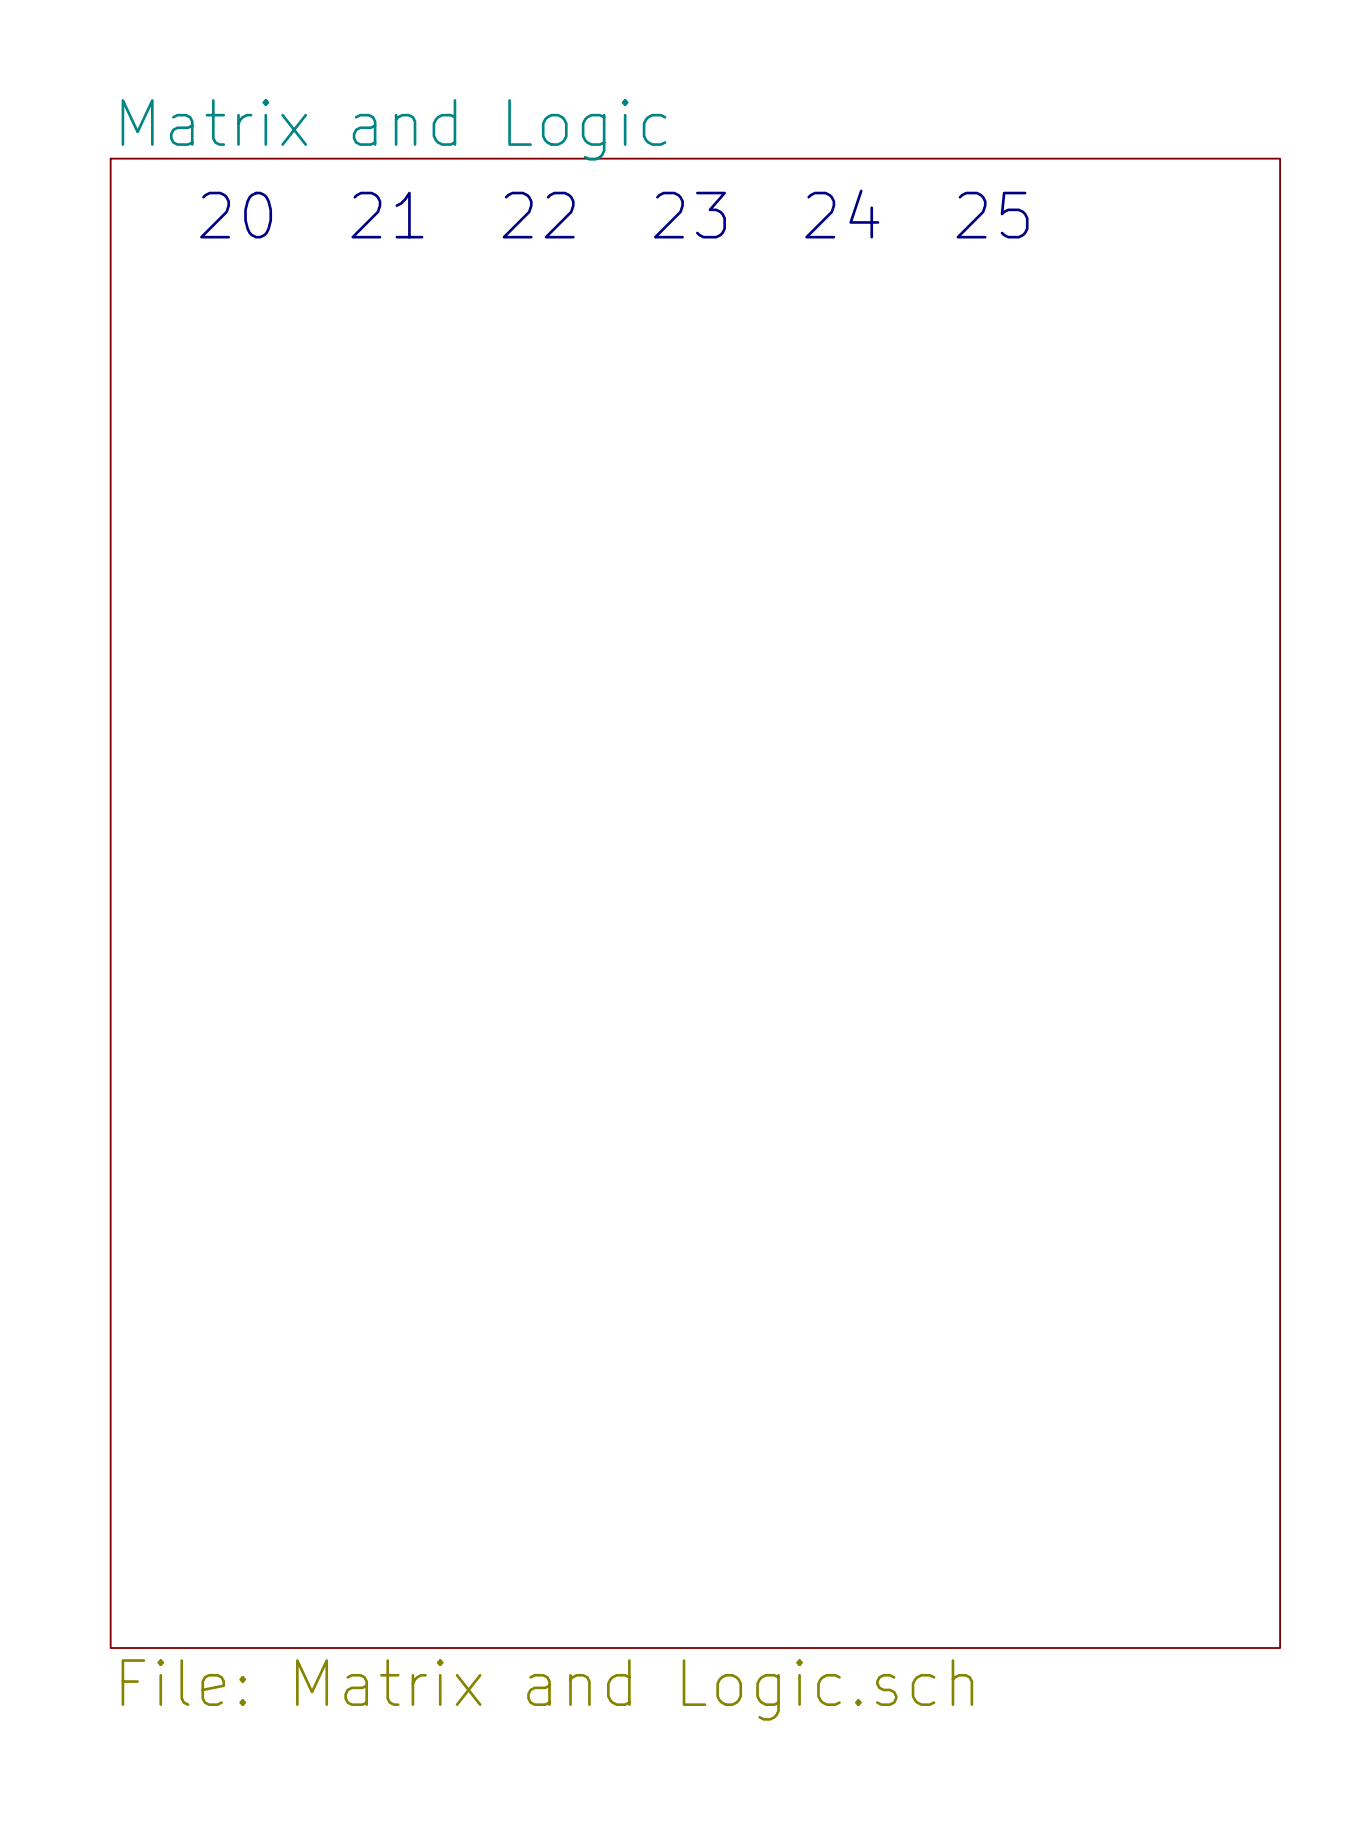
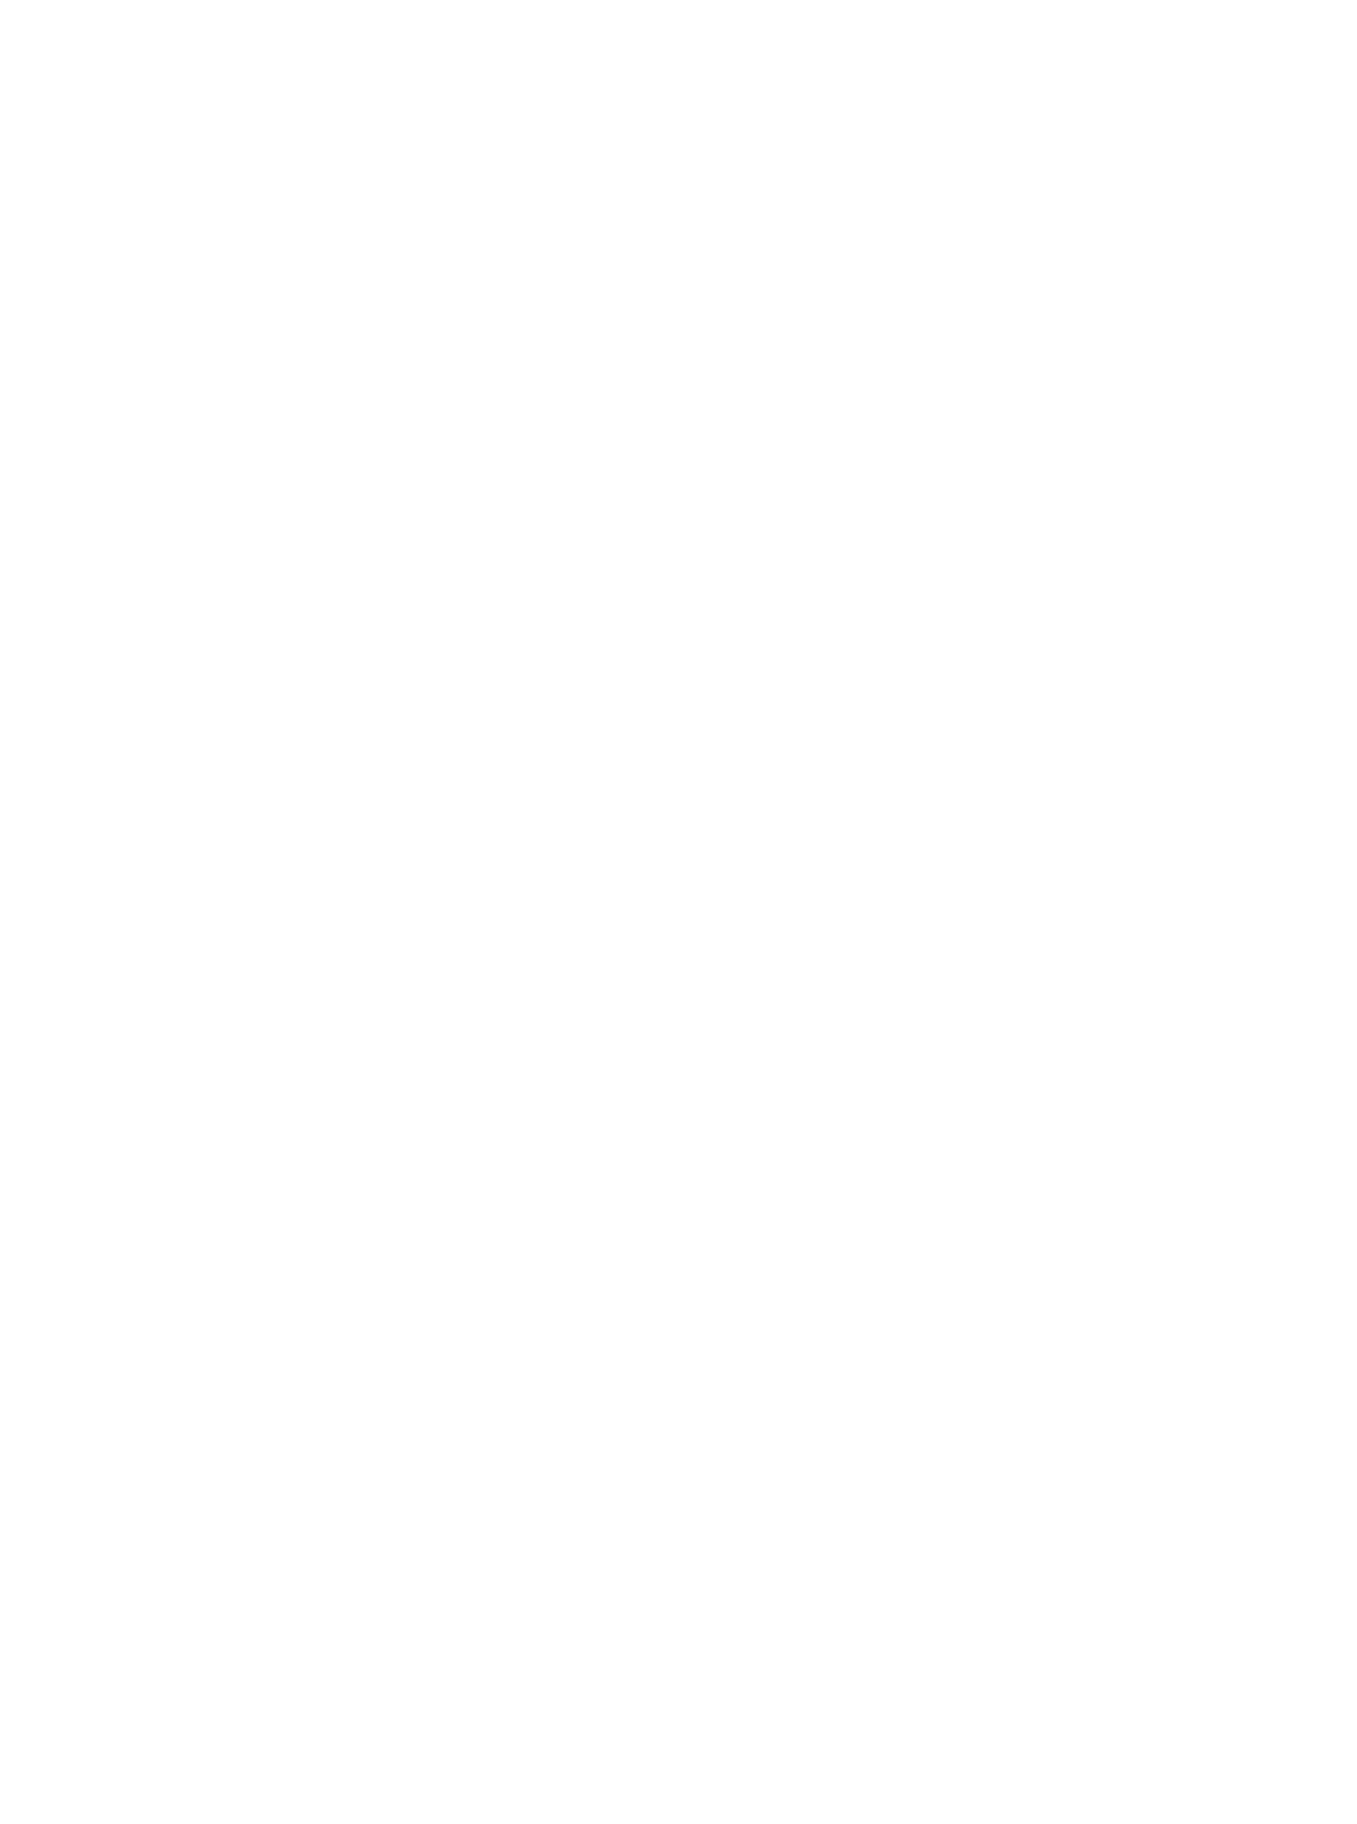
text: 20 21 22 23 24 25 (614, 214) -> none
sheet Matrix and Logic: File: Matrix and Logic.sch (695, 903) -> none

